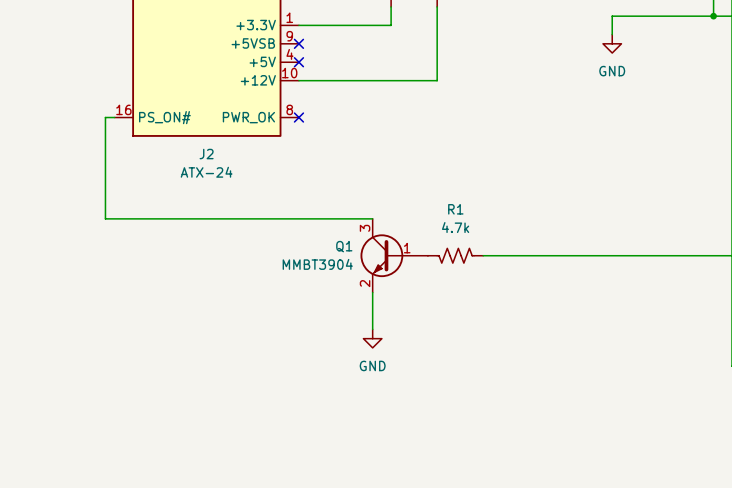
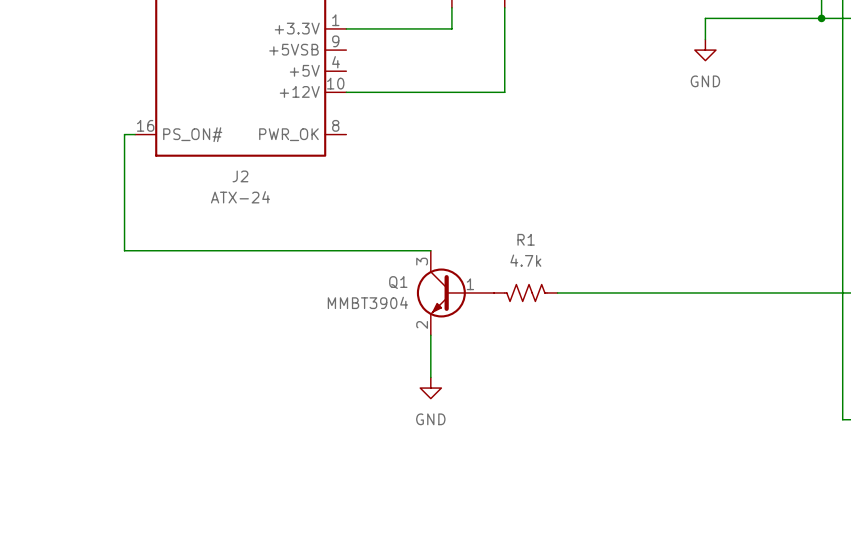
no-connect mark: (298, 43) -> none
no-connect mark: (298, 62) -> none
no-connect mark: (298, 117) -> none

